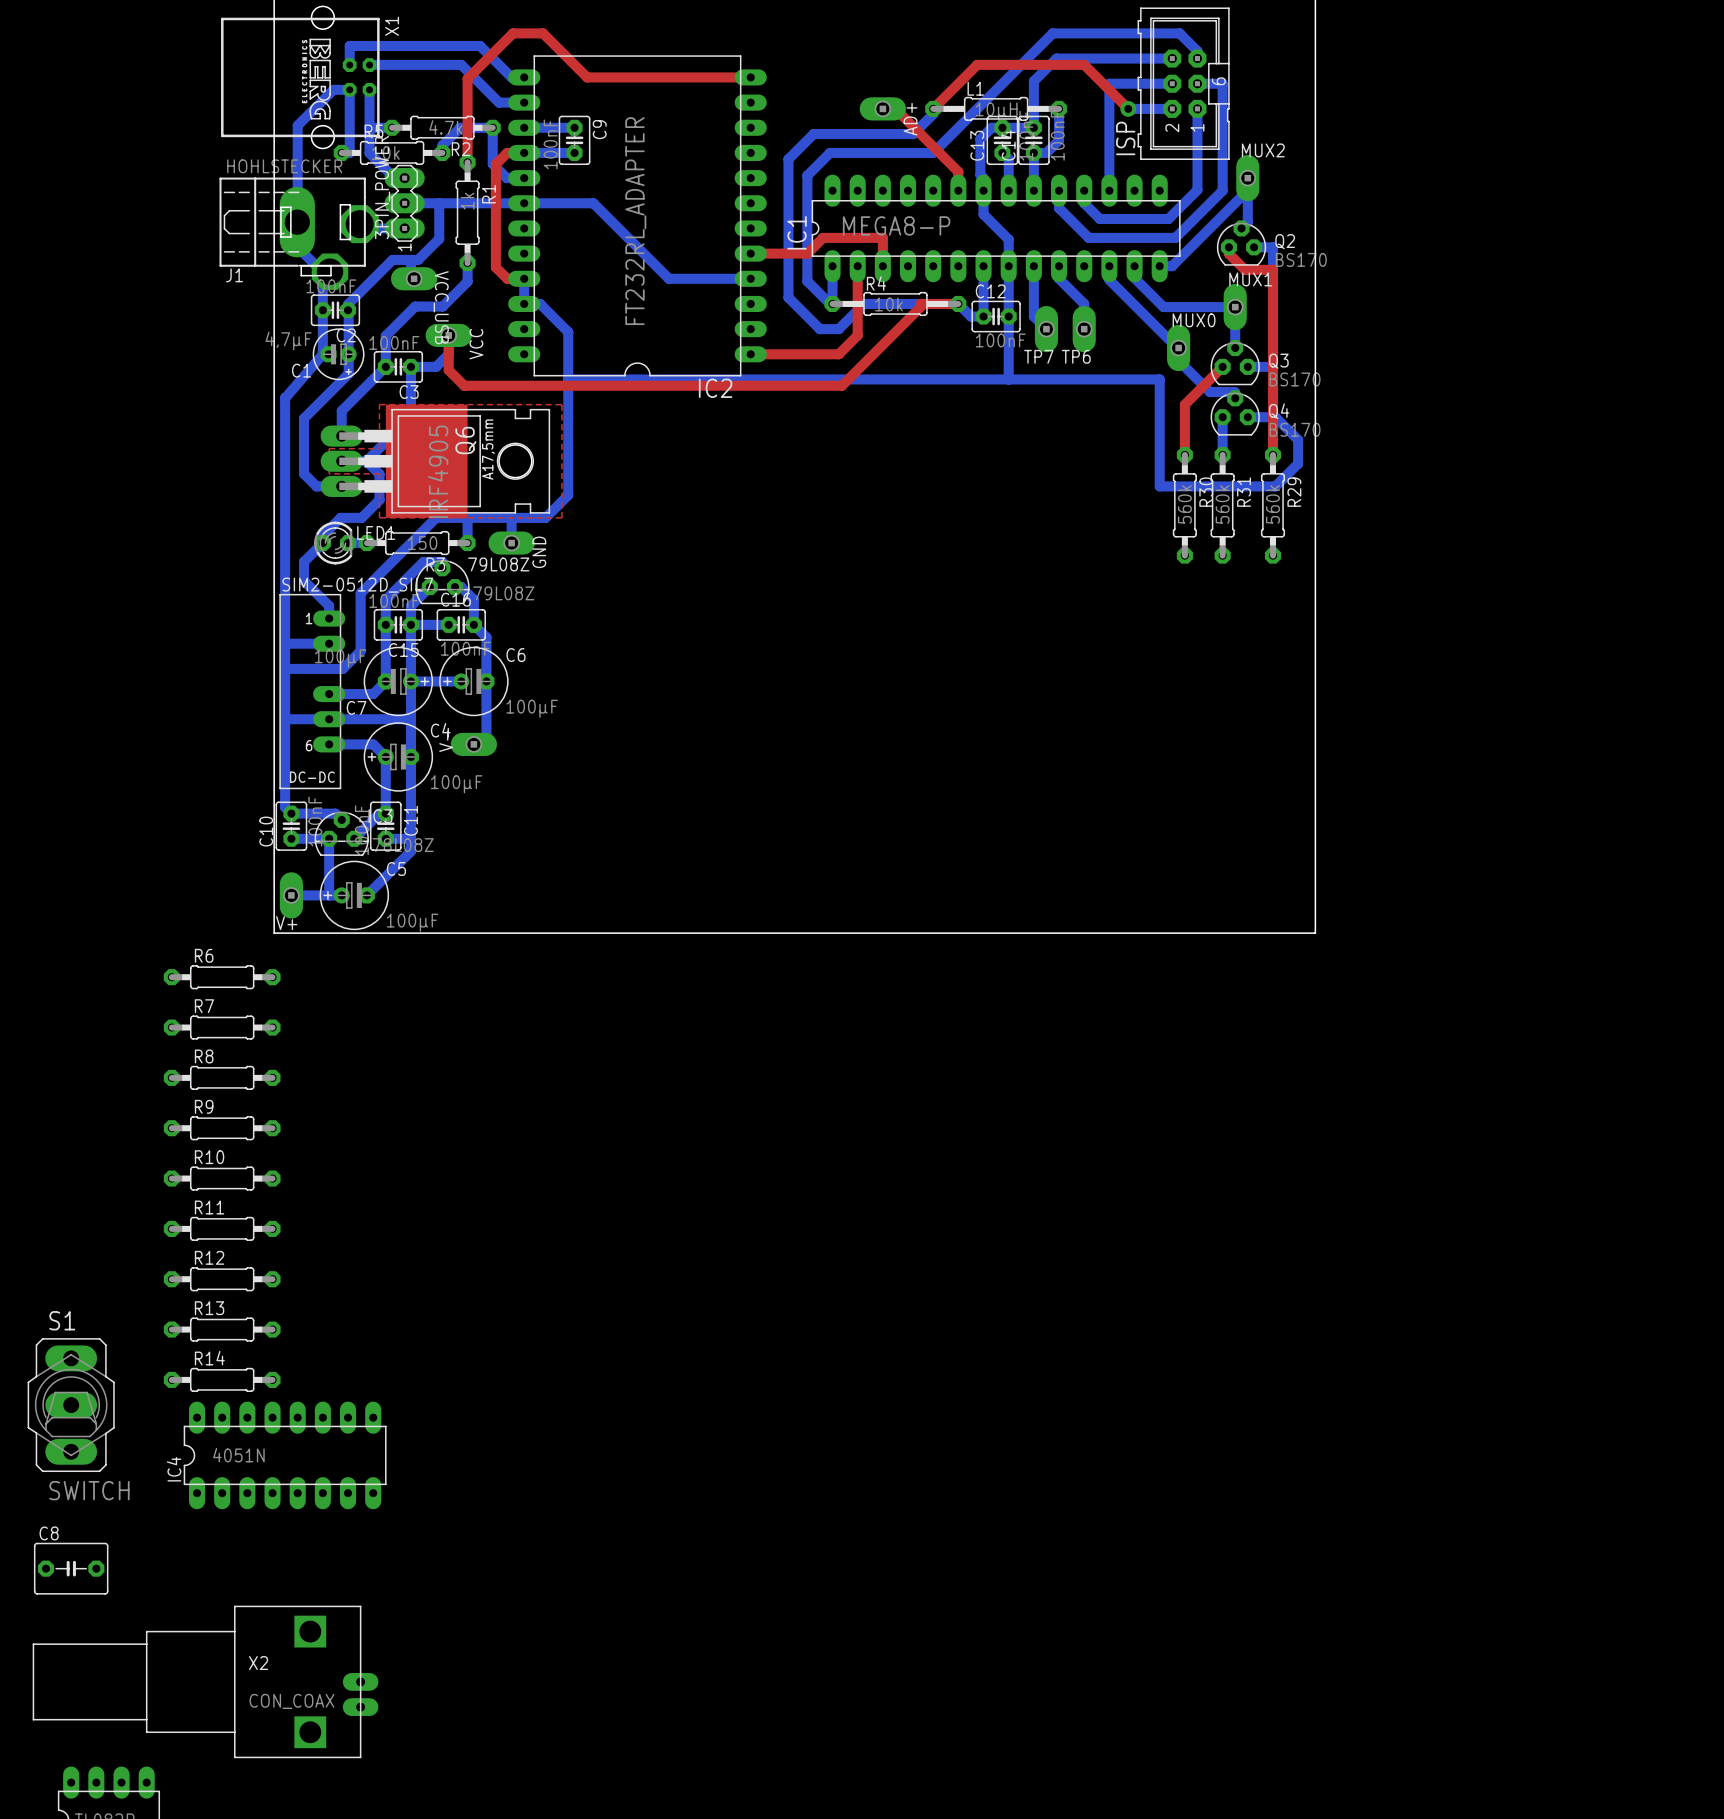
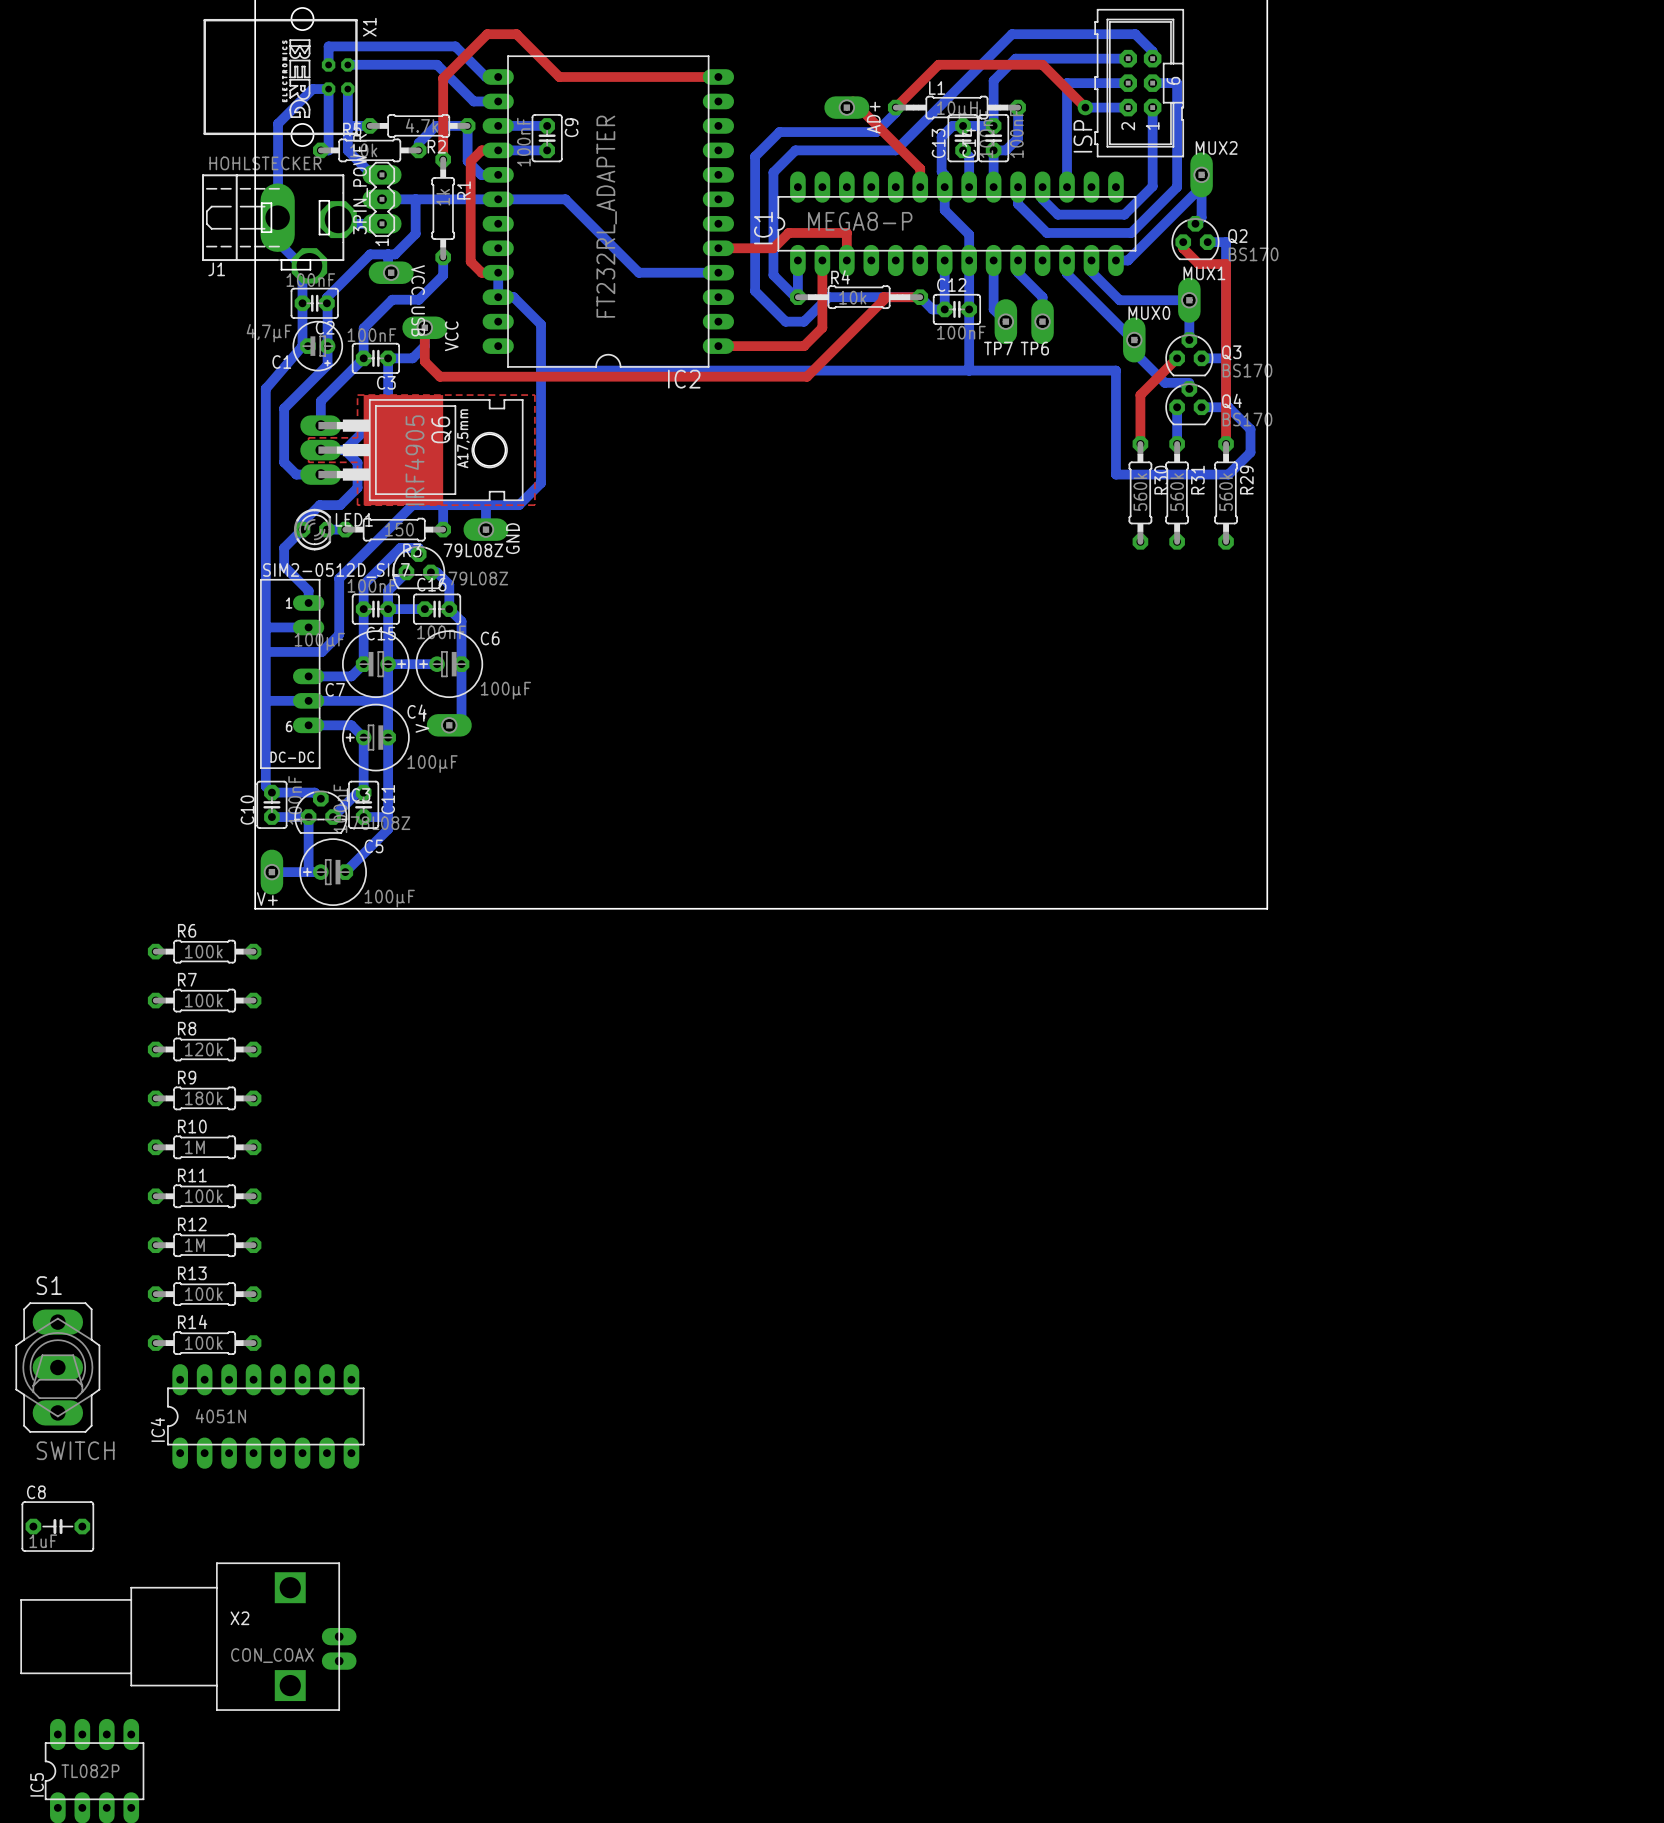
R6 value: none -> 100k (203, 951)
R7 value: none -> 100k (203, 1000)
R8 value: none -> 120k (203, 1049)
R9 value: none -> 180k (203, 1098)
R10 value: none -> 1M (194, 1147)
R11 value: none -> 100k (203, 1196)
R12 value: none -> 1M (194, 1245)
R13 value: none -> 100k (203, 1294)
R14 value: none -> 100k (203, 1343)
C8 value: none -> 1uF (43, 1541)

